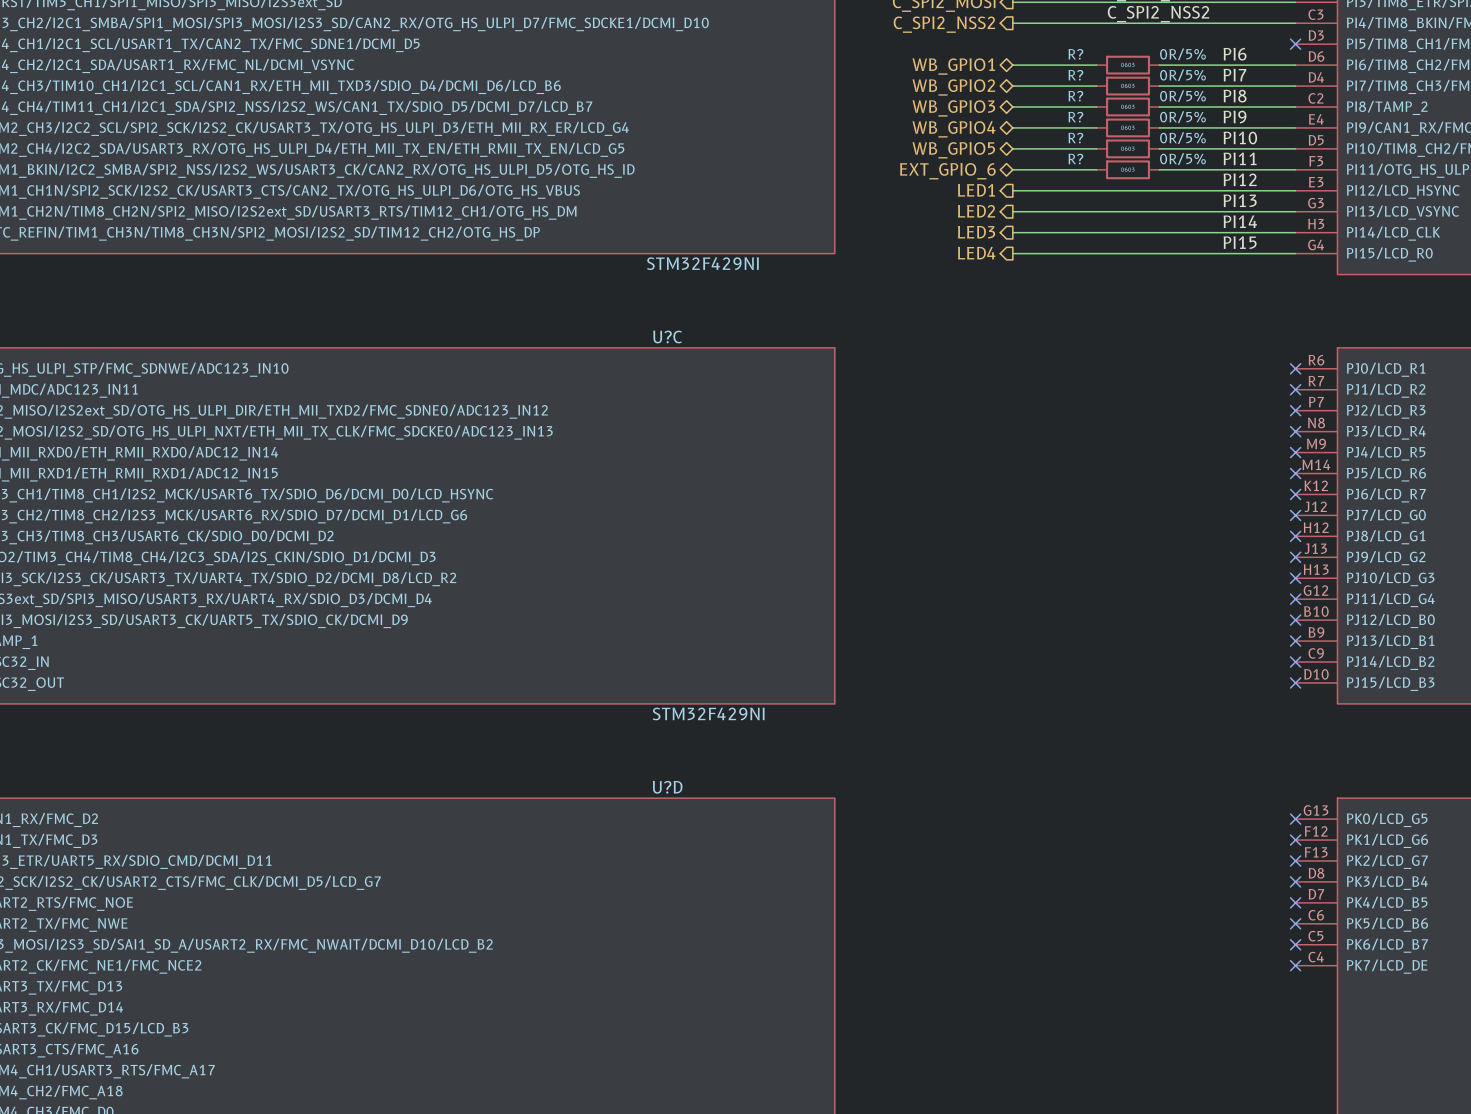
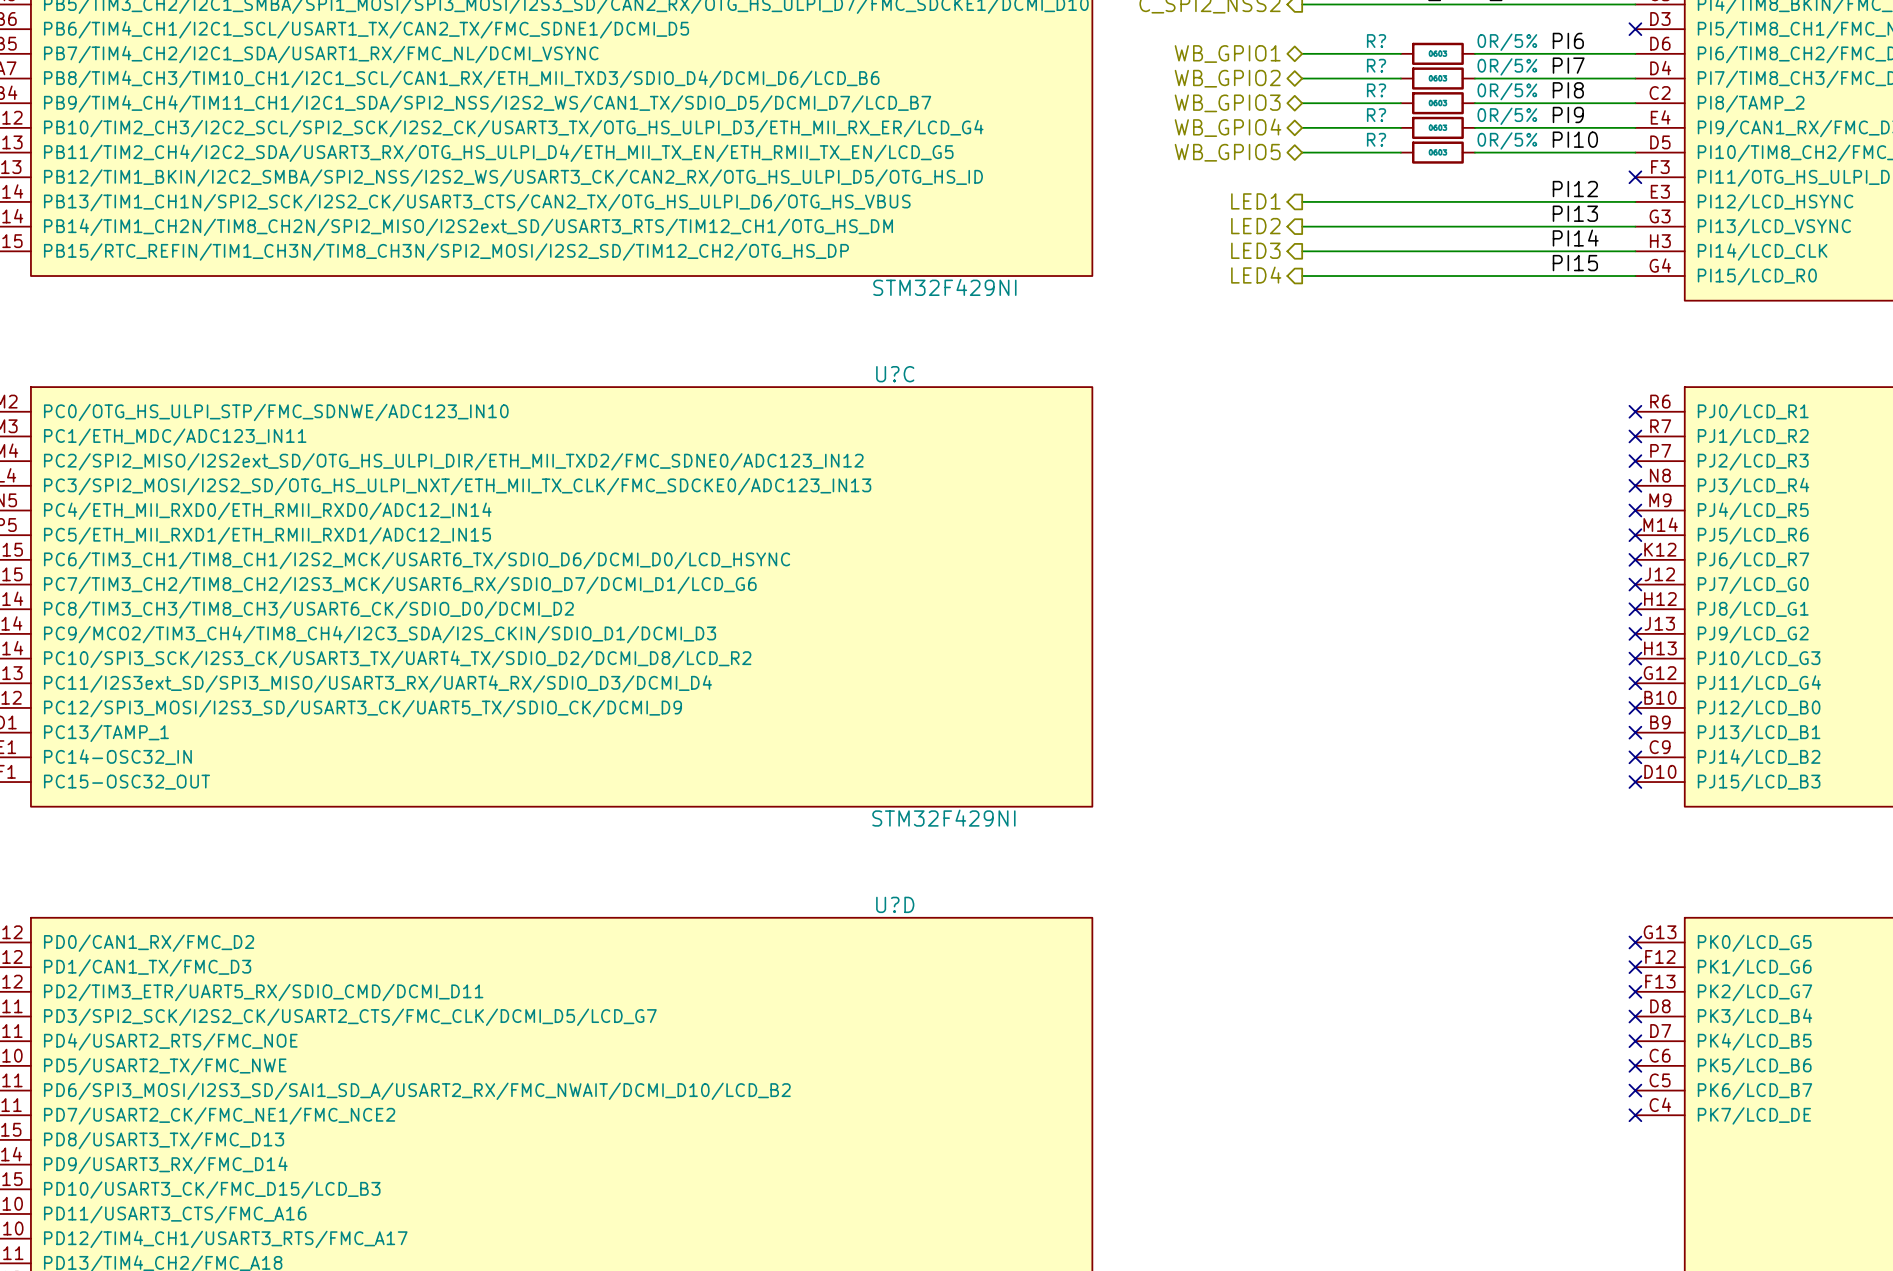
label: PI11 (1240, 158) -> none
wire: (1012, 169) (1096, 169) -> none
R?: 0R/5% (1128, 169) -> none
wire: (1159, 169) (1295, 169) -> none
no-connect mark: none -> (1635, 177)
hierarchical label: EXT_GPIO_6 (947, 171) -> none

